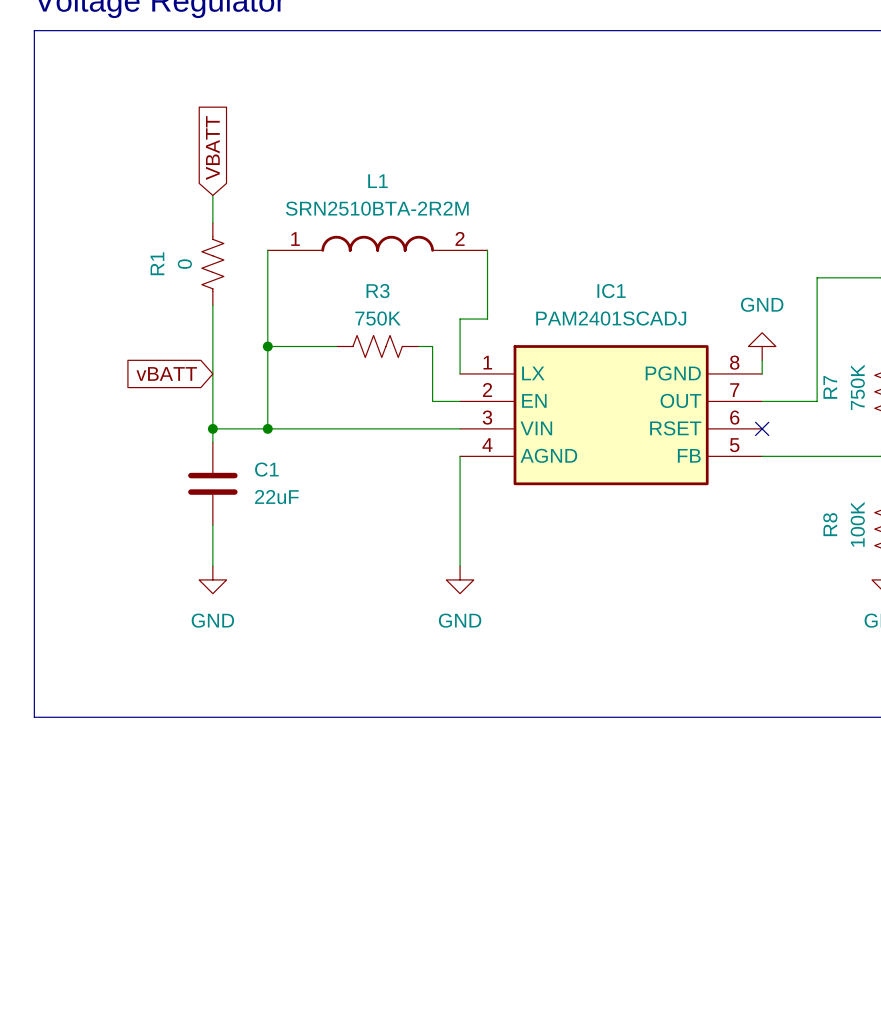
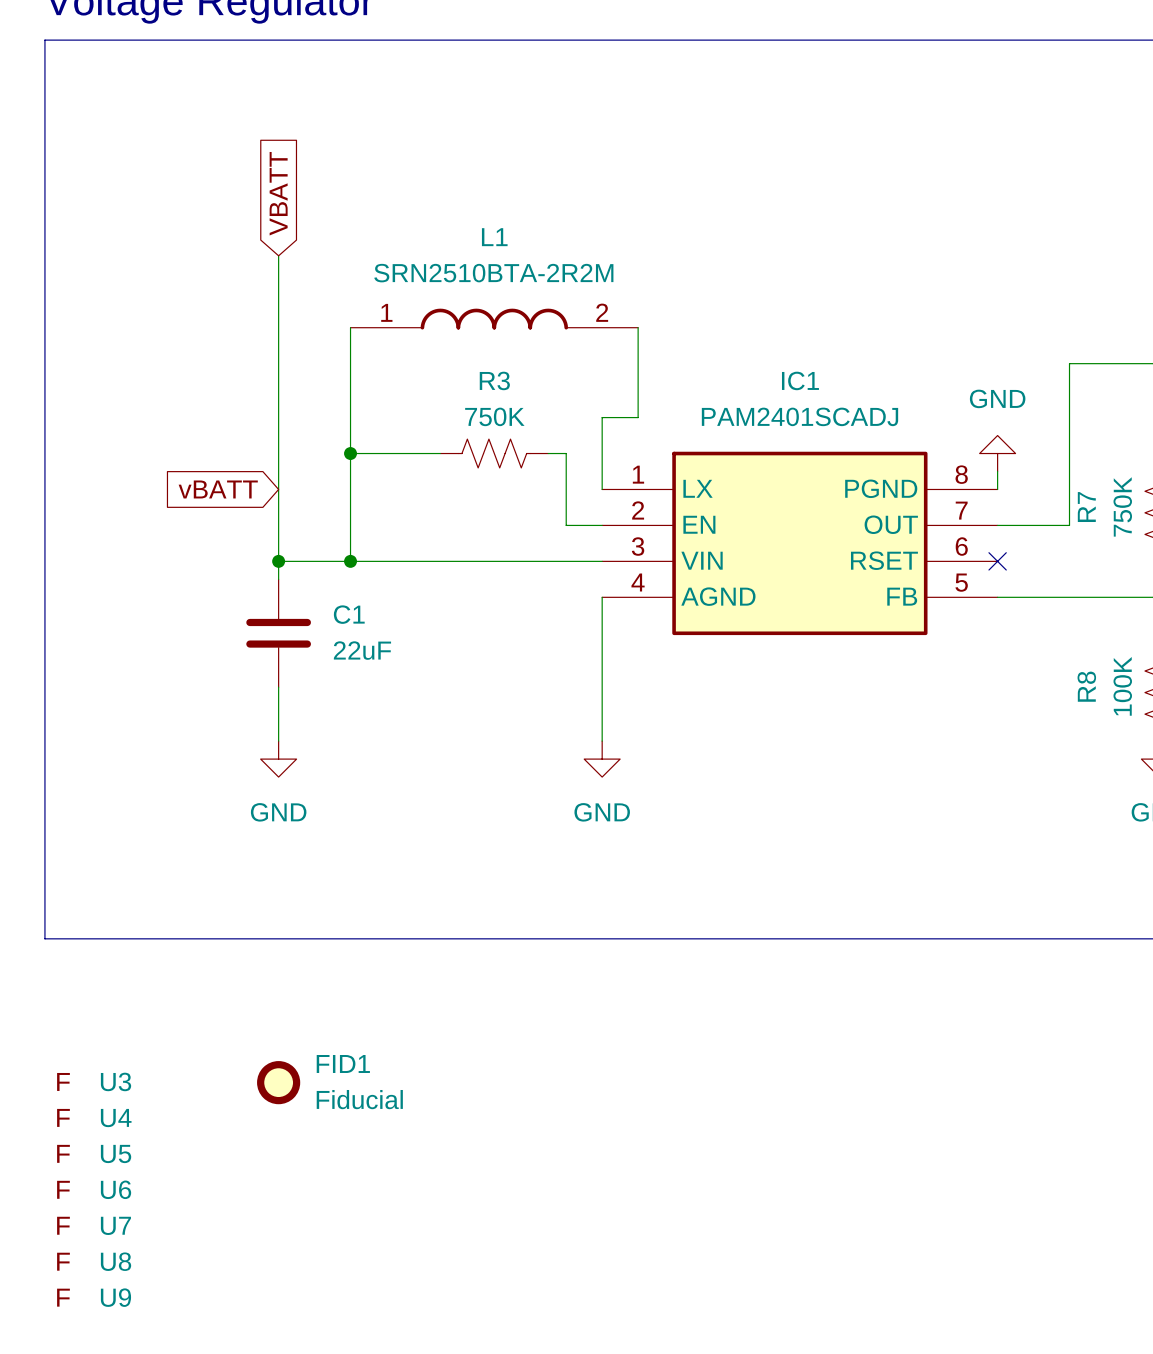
wire: none -> (278, 291) (278, 399)
R1: 0 (212, 264) -> none
U3: none -> (94, 1081)
FID1: none -> Fiducial (278, 1082)
U4: none -> (94, 1118)
U5: none -> (94, 1153)
U6: none -> (94, 1189)
U7: none -> (94, 1225)
U8: none -> (94, 1261)
U9: none -> (94, 1297)

